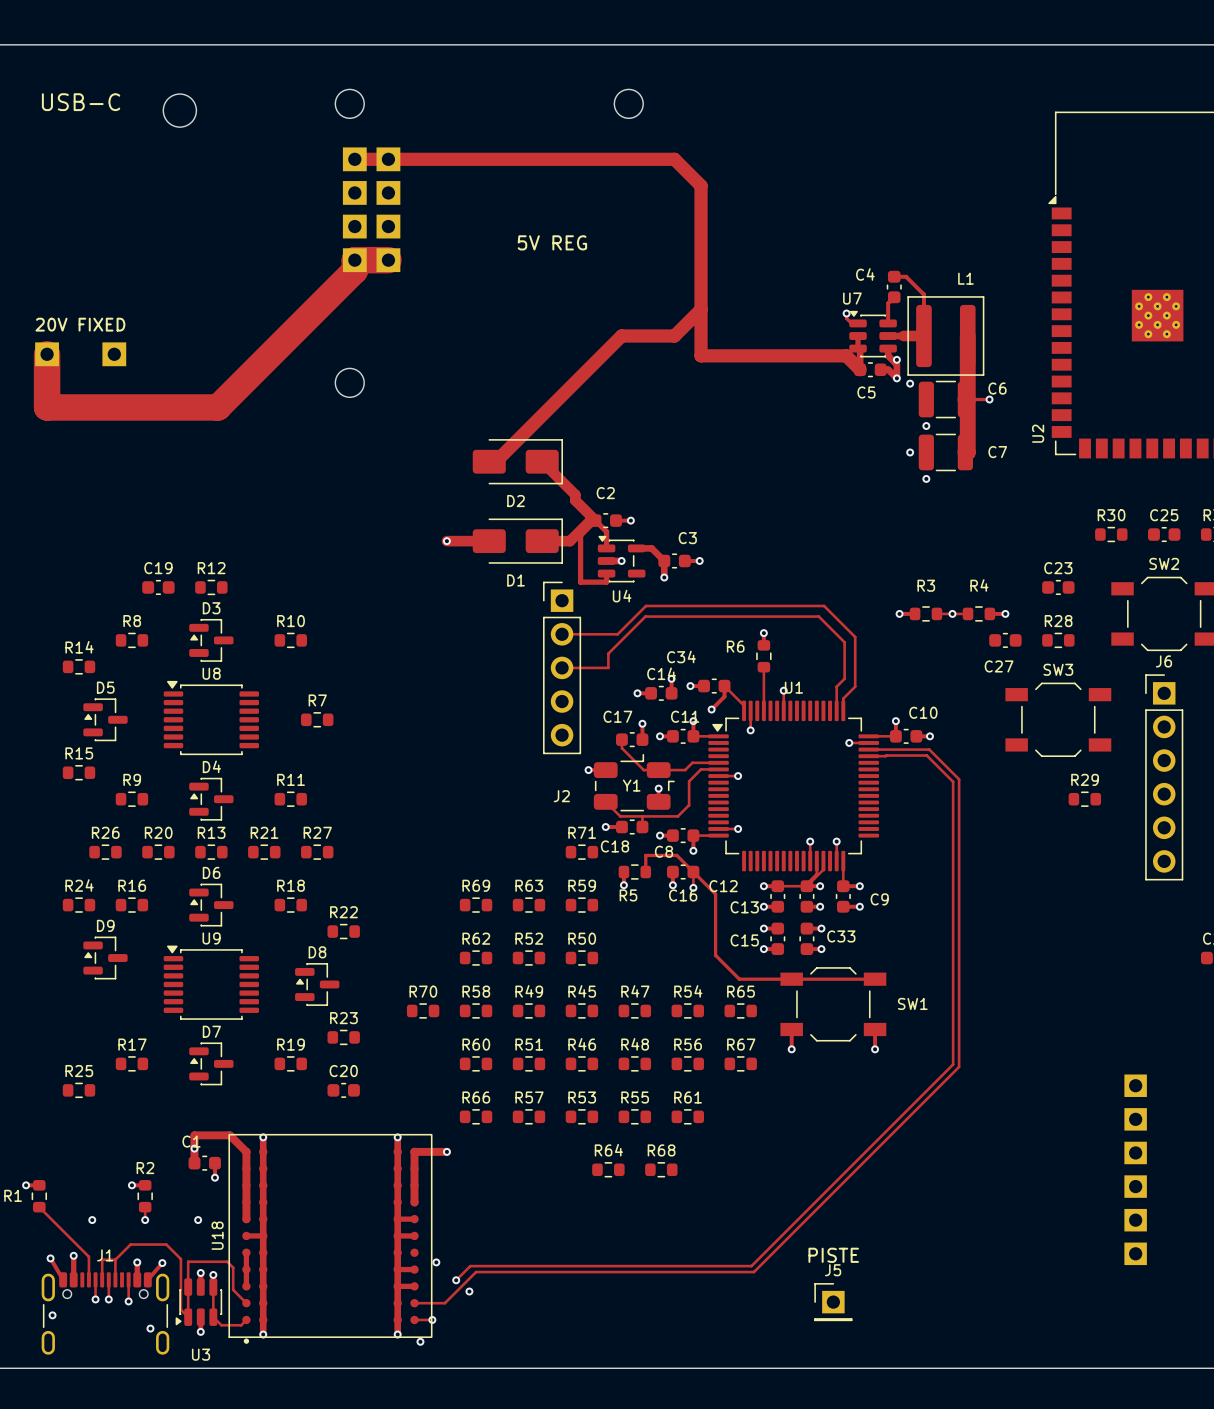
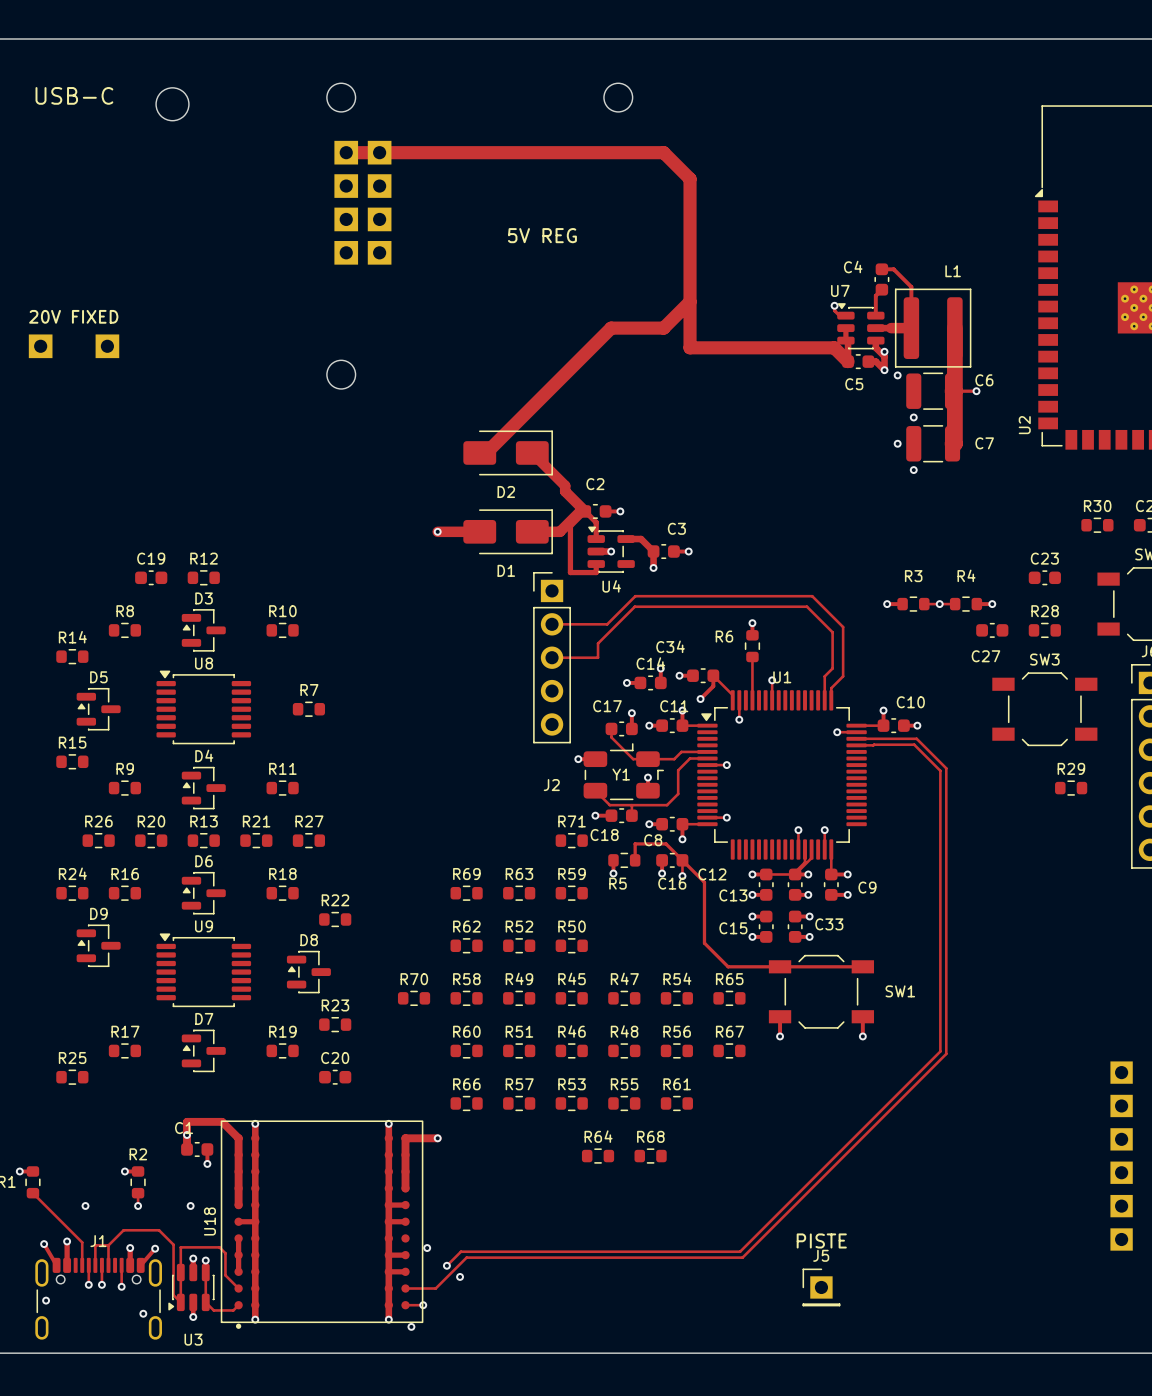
track: (388, 260) (354, 260) (354, 270) (217, 407) (47, 407) (47, 354) -> none

